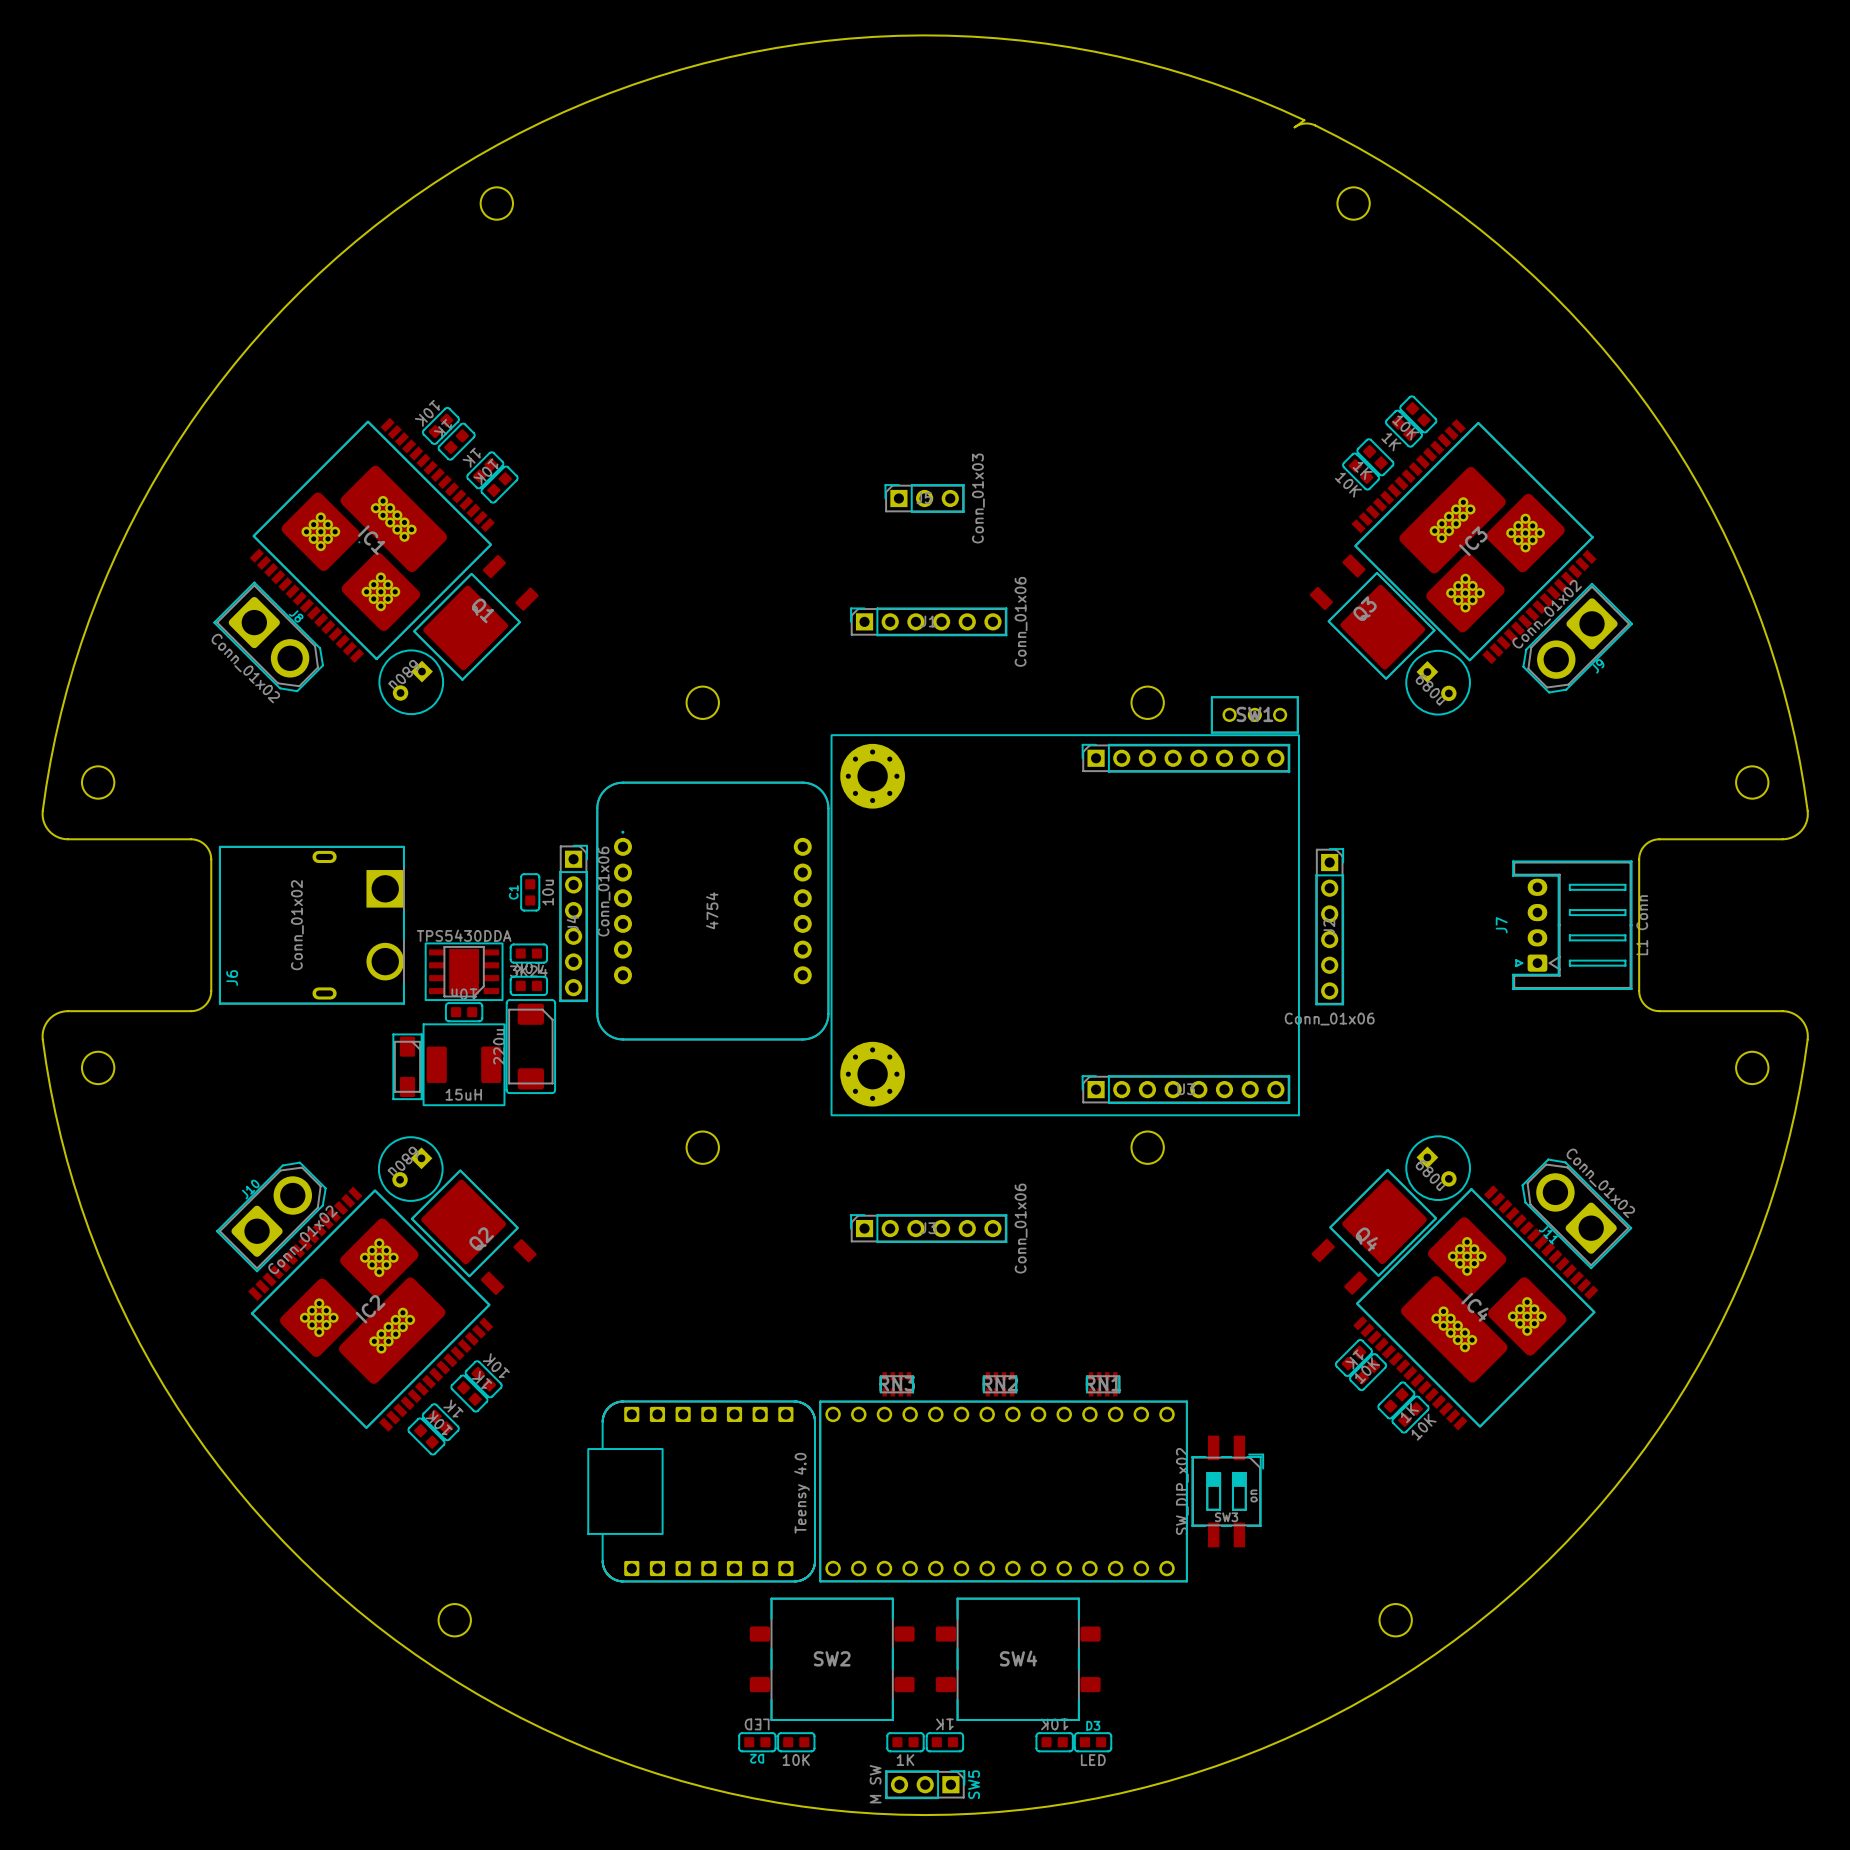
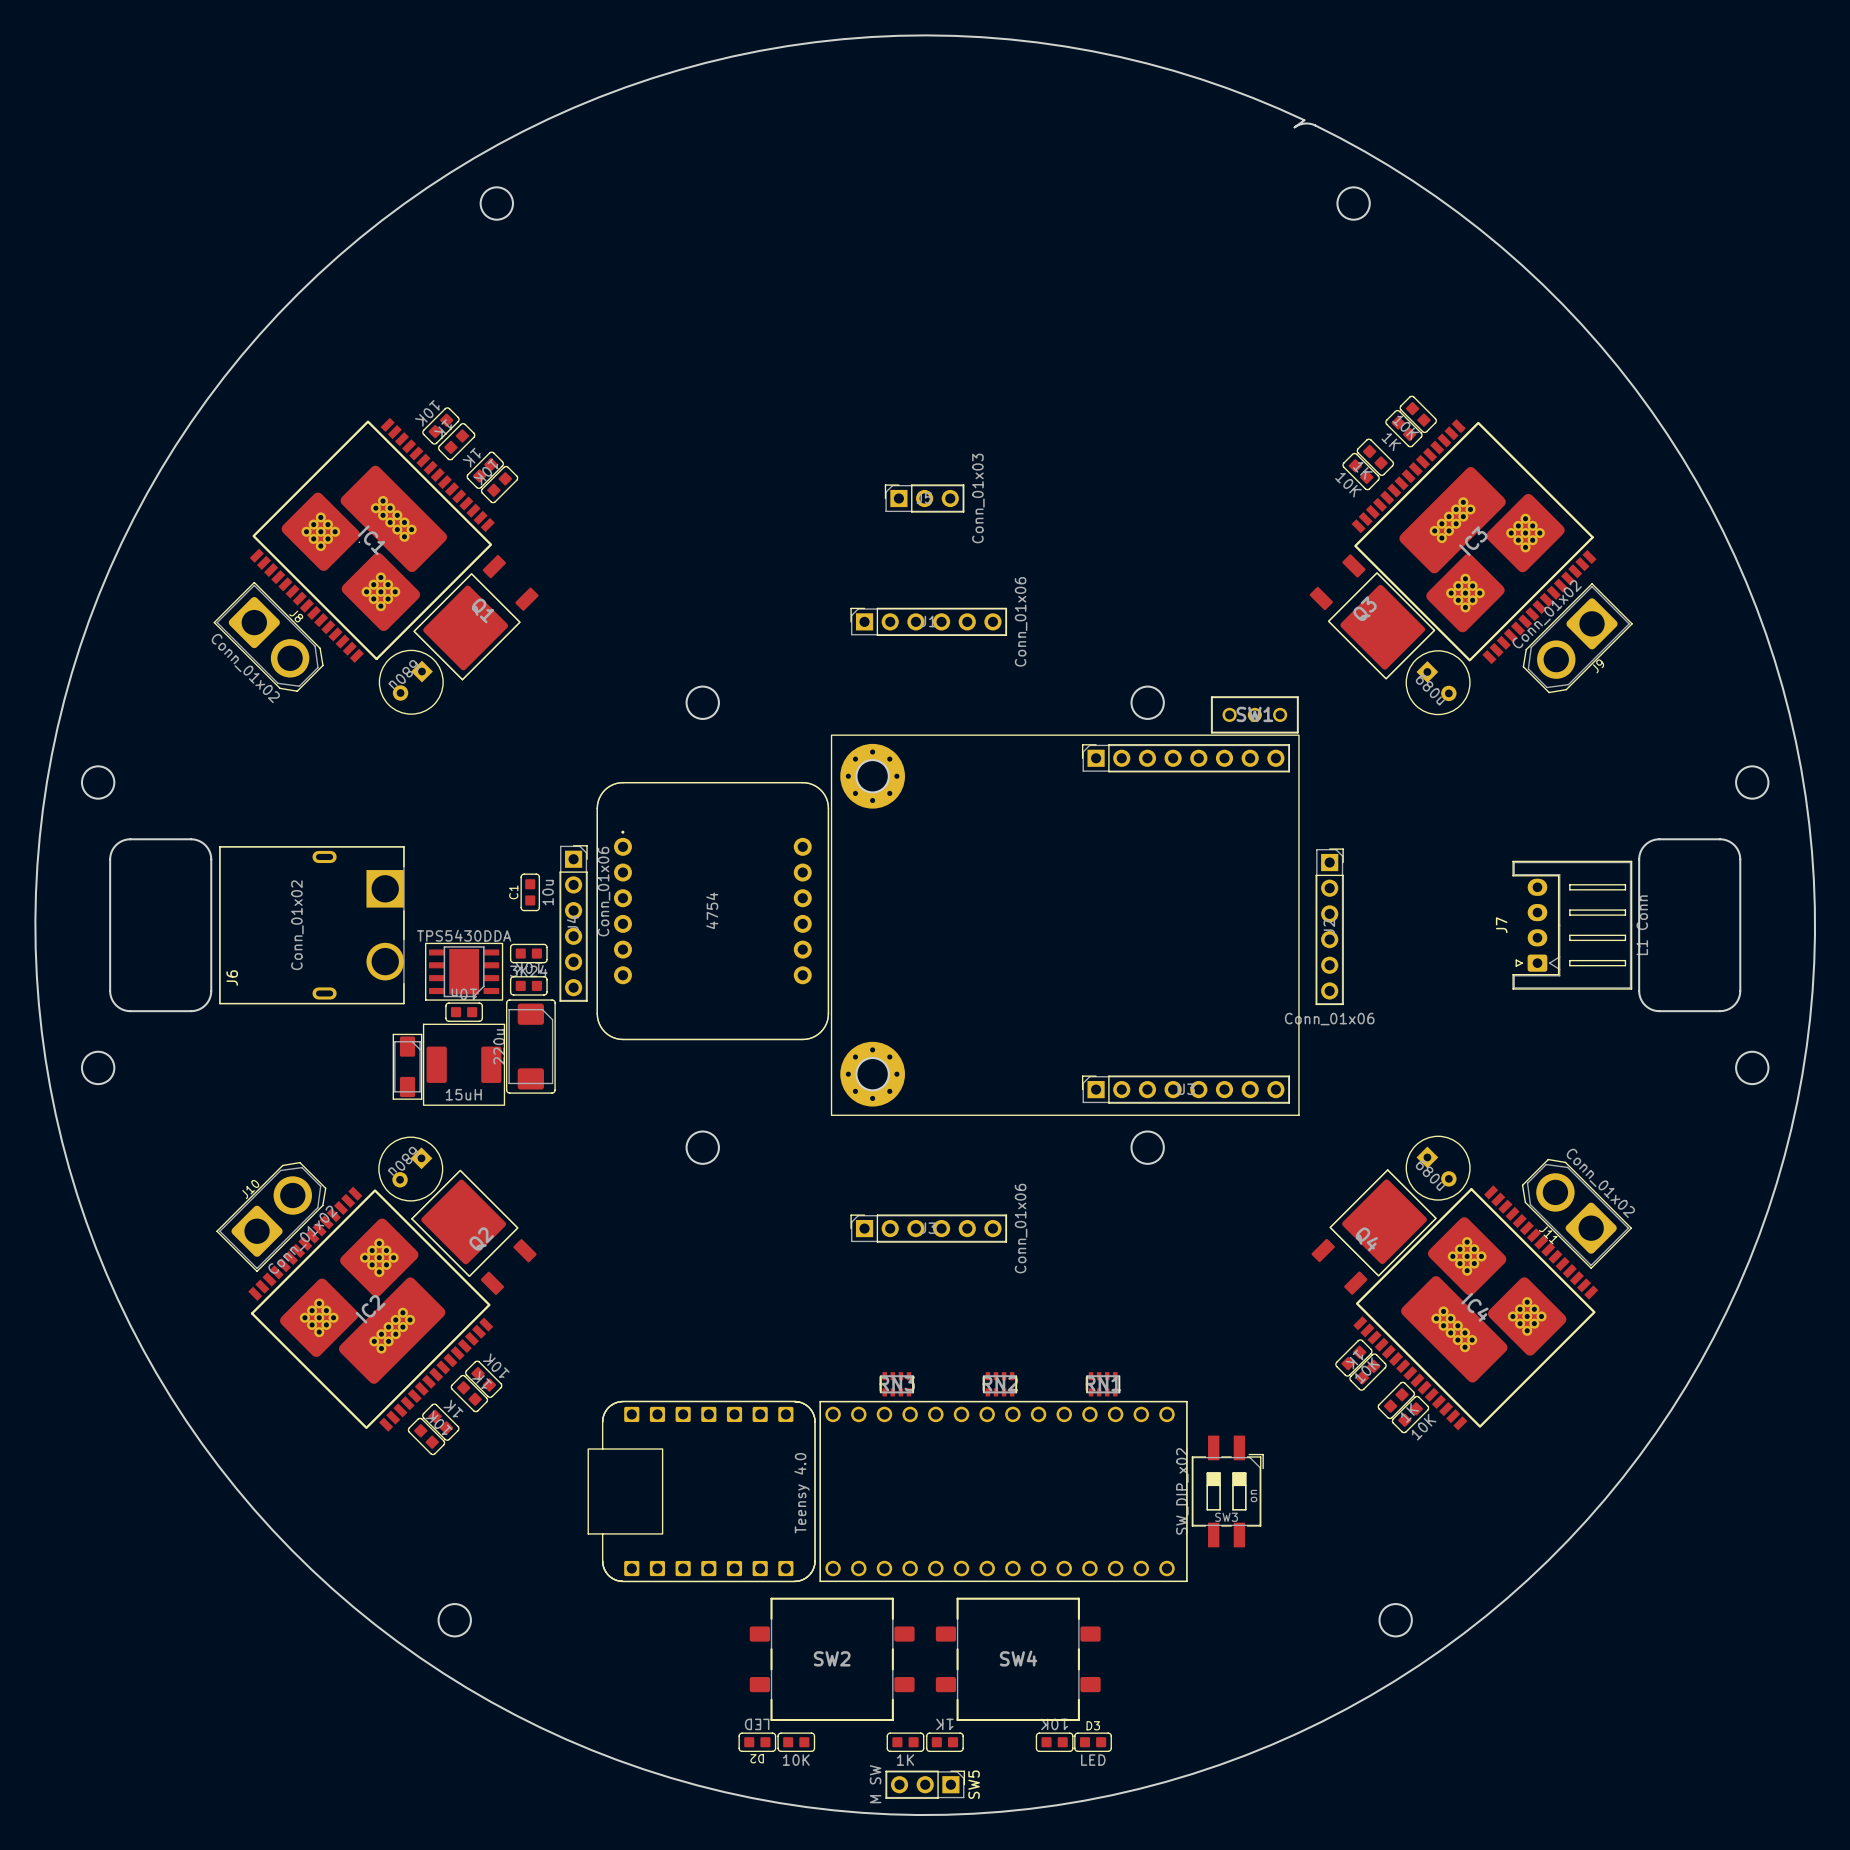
board edge: (1304, 120) (1213, 83) (1166, 68) (1094, 51) (1045, 43) (972, 36) (873, 36) (824, 41) (751, 52) (656, 77) (586, 102) (541, 122) (455, 169) (414, 196) (355, 241) (300, 291) (266, 326) (234, 363) (190, 423) (163, 464) (128, 529) (98, 596) (73, 666) (55, 737) (42, 813) (44, 822) (48, 830) (61, 838) (130, 839) -> (130, 1011) (123, 1010) (116, 1005) (112, 999) (110, 990) (110, 857) (112, 850) (117, 843) (130, 839)
board edge: (1315, 125) (1358, 148) (1421, 186) (1480, 229) (1535, 277) (1586, 330) (1618, 367) (1661, 426) (1700, 488) (1733, 553) (1769, 644) (1795, 738) (1807, 813) (1803, 828) (1796, 834) (1788, 838) (1720, 839) -> (1315, 125) (1388, 165) (1458, 212) (1522, 265) (1562, 304) (1600, 345) (1651, 411) (1696, 482) (1735, 556) (1766, 634) (1782, 687) (1795, 741) (1809, 824) (1814, 907) (1812, 991) (1802, 1074) (1784, 1156) (1759, 1235) (1726, 1312) (1686, 1386) (1639, 1455) (1586, 1520) (1527, 1579) (1463, 1633) (1418, 1665) (1370, 1695) (1296, 1733) (1219, 1765) (1138, 1789) (1056, 1805) (973, 1813) (890, 1814) (806, 1807) (751, 1797) (697, 1785) (617, 1760) (540, 1727) (466, 1687) (419, 1657) (375, 1624) (311, 1569) (254, 1509) (202, 1443) (156, 1373) (117, 1299) (86, 1221) (62, 1141) (45, 1059) (38, 1004) (35, 948) (37, 865) (46, 782) (64, 700) (89, 620) (121, 543) (160, 469) (207, 399) (259, 334) (297, 294) (338, 256) (404, 203) (474, 158) (548, 119) (625, 87) (705, 62) (787, 46) (870, 37) (954, 35) (1037, 42) (1120, 56) (1174, 70) (1227, 88) (1304, 120)
board edge: (130, 1011) (61, 1011) (51, 1017) (44, 1027) (42, 1039) (50, 1088) (73, 1184) (107, 1276) (151, 1365) (190, 1427) (219, 1467) (284, 1542) (337, 1593) (415, 1654) (499, 1706) (565, 1739) (634, 1766) (729, 1793) (826, 1809) (925, 1815) (999, 1811) (1096, 1798) (1168, 1781) (1262, 1748) (1351, 1706) (1434, 1654) (1493, 1609) (1566, 1542) (1630, 1467) (1686, 1386) (1732, 1299) (1760, 1231) (1776, 1184) (1799, 1088) (1807, 1039) (1806, 1027) (1799, 1017) (1788, 1011) (1720, 1011) -> (1720, 839) (1726, 840) (1734, 845) (1739, 852) (1740, 859) (1740, 993) (1737, 1001) (1732, 1006) (1720, 1011)

